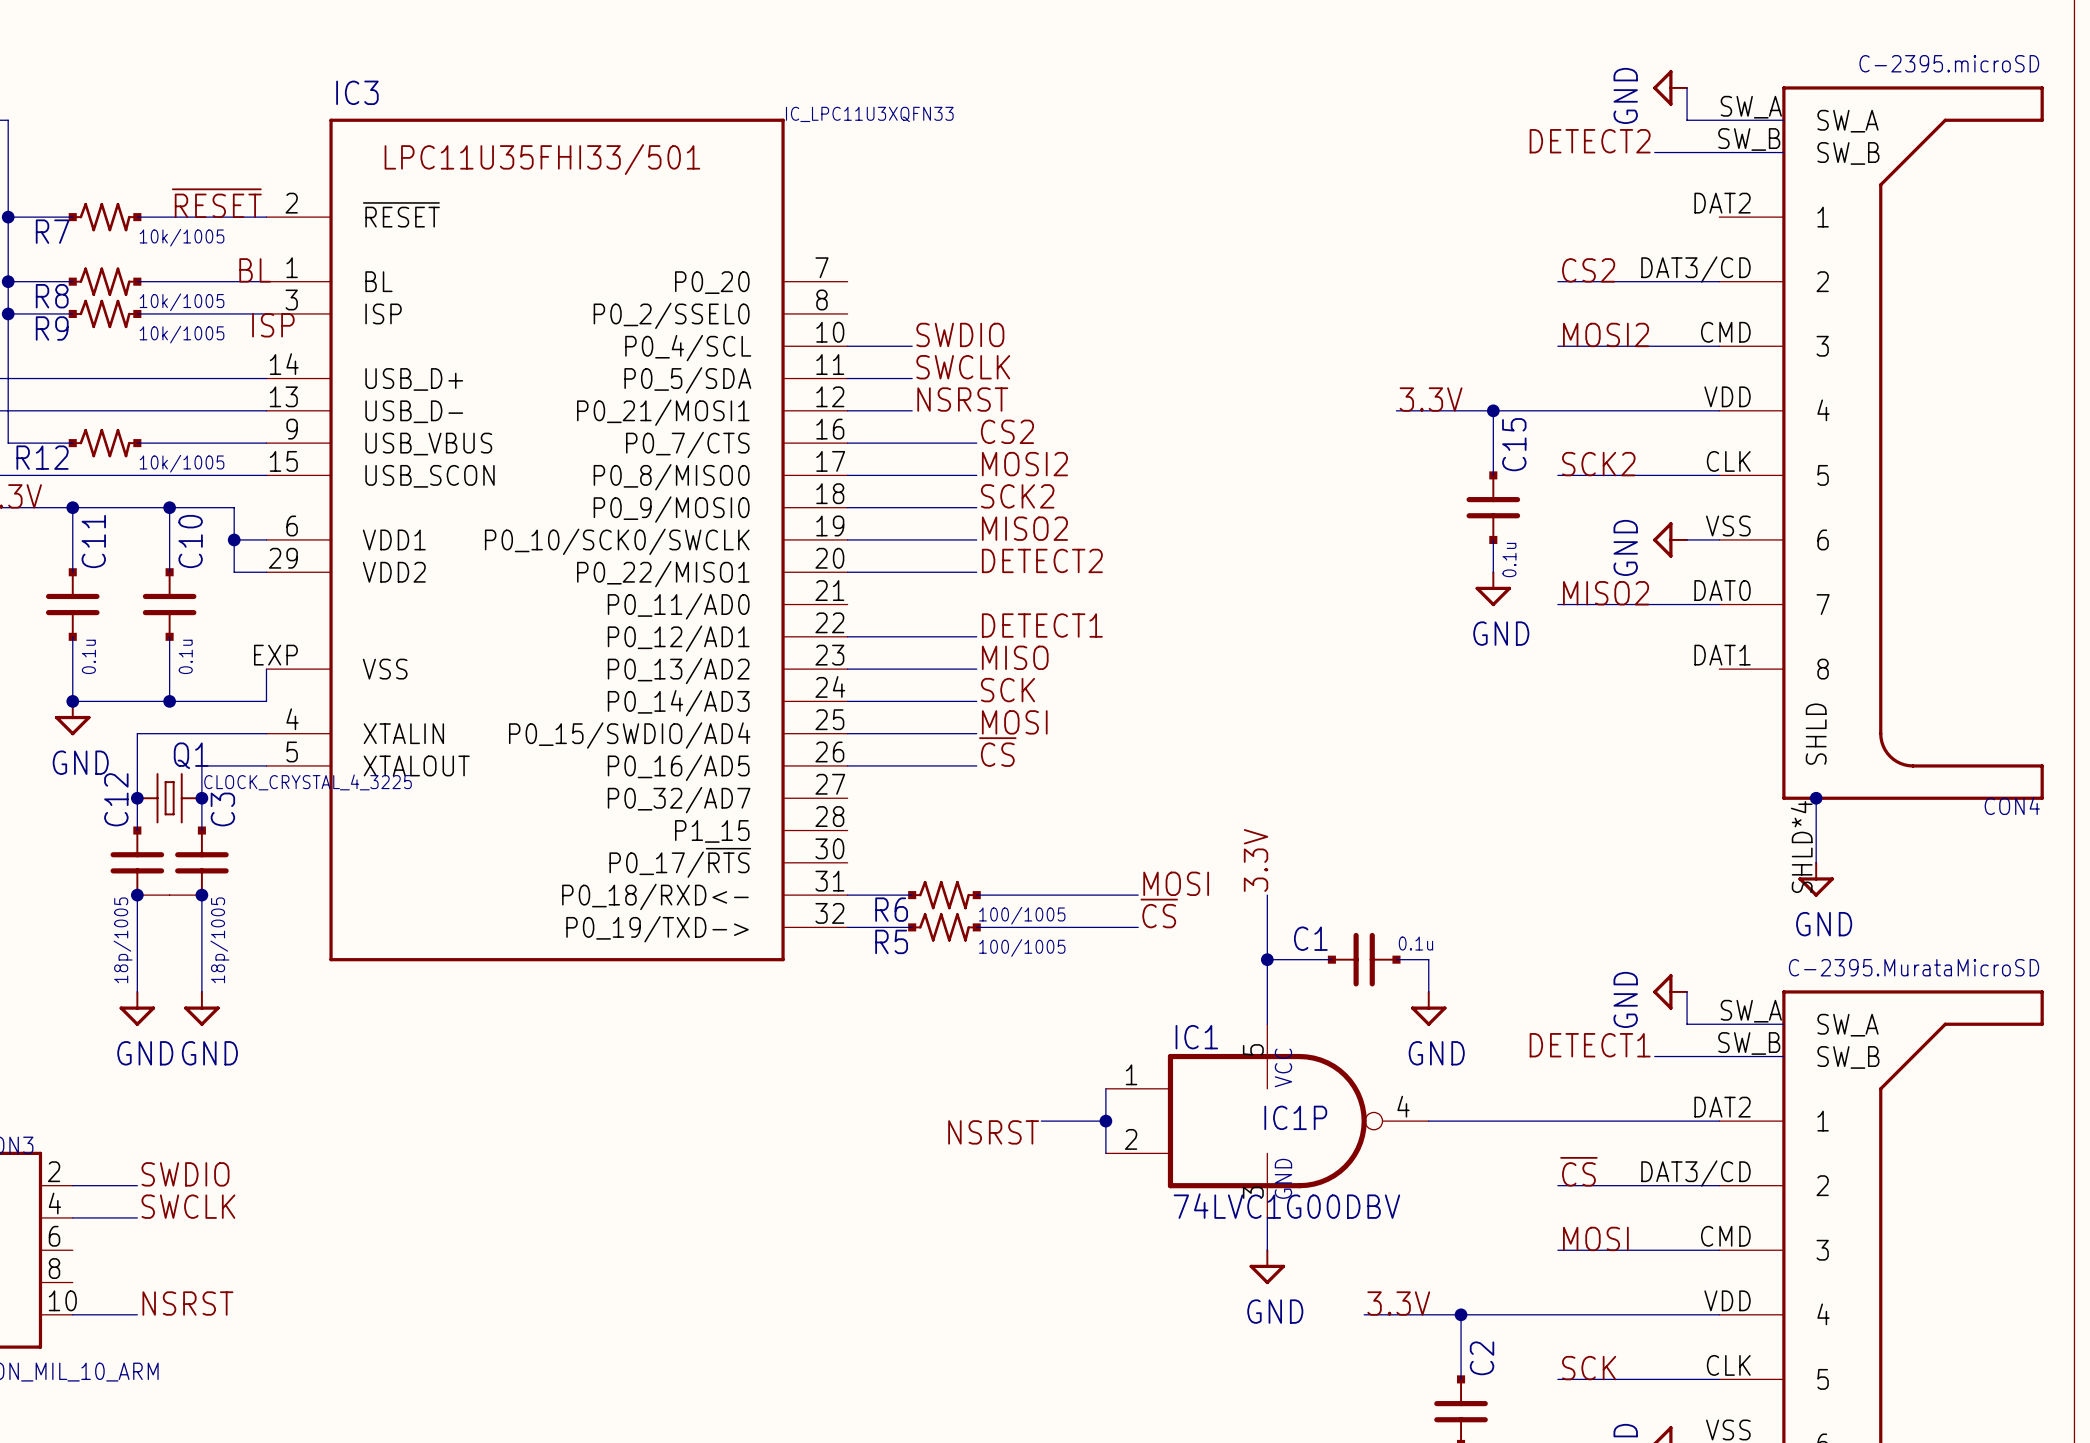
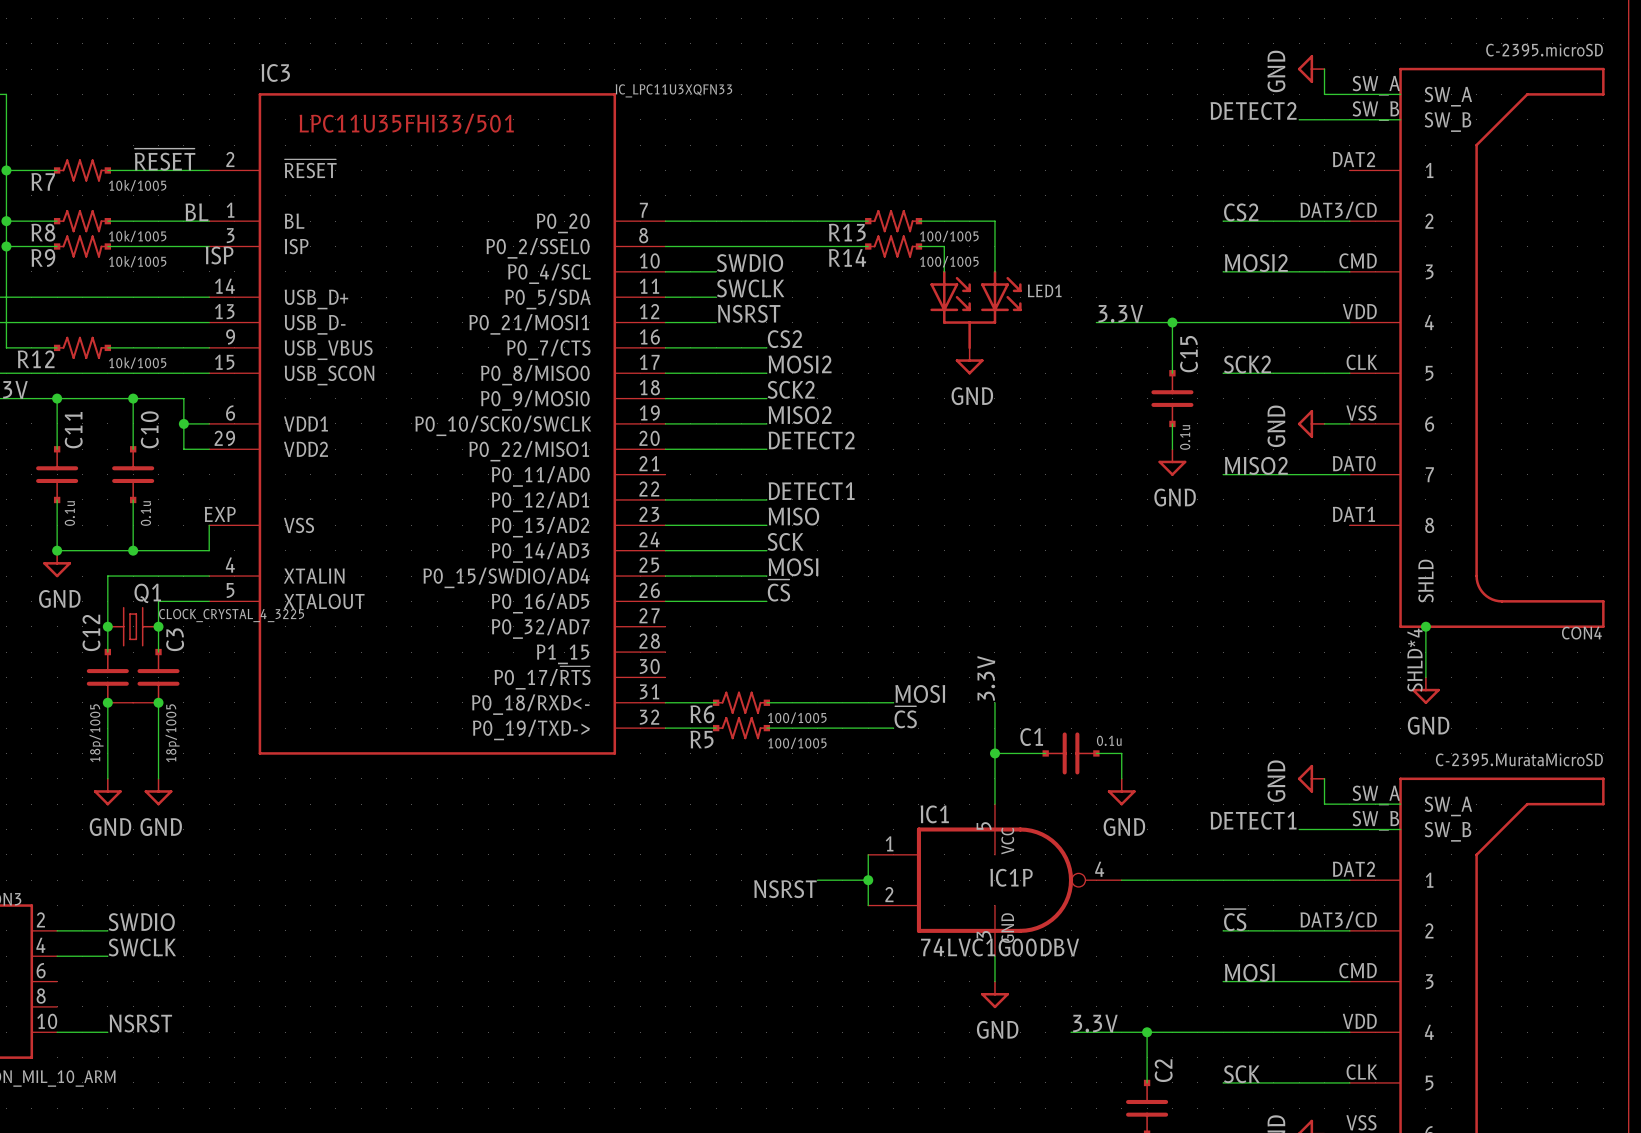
wire: none -> (665, 221) (868, 221)
R13: none -> 100/1005 (893, 221)
wire: none -> (918, 221) (994, 221) (994, 271)
wire: none -> (665, 246) (868, 246)
R14: none -> 100/1005 (893, 246)
wire: none -> (918, 246) (944, 246) (944, 271)
LED1: none -> (975, 309)
power symbol: none -> GND (969, 360)

